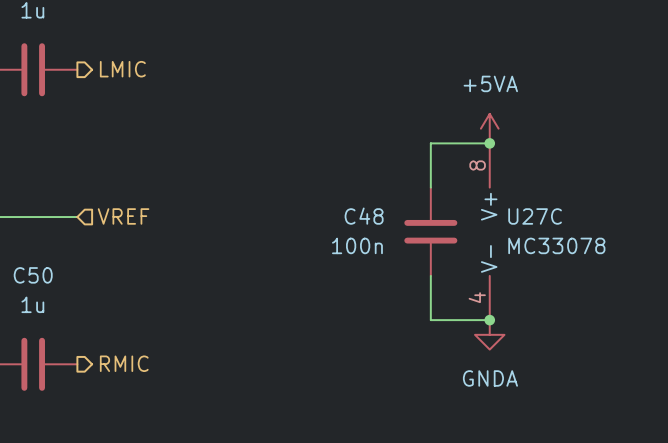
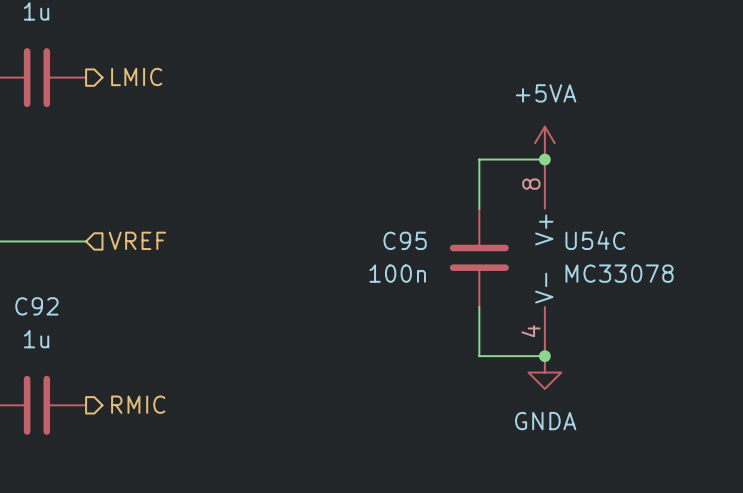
C48 name: C48 (364, 216) -> C95 (405, 240)
U27C name: U27C (535, 216) -> U54C (595, 240)
C50 name: C50 (33, 275) -> C92 (36, 306)

